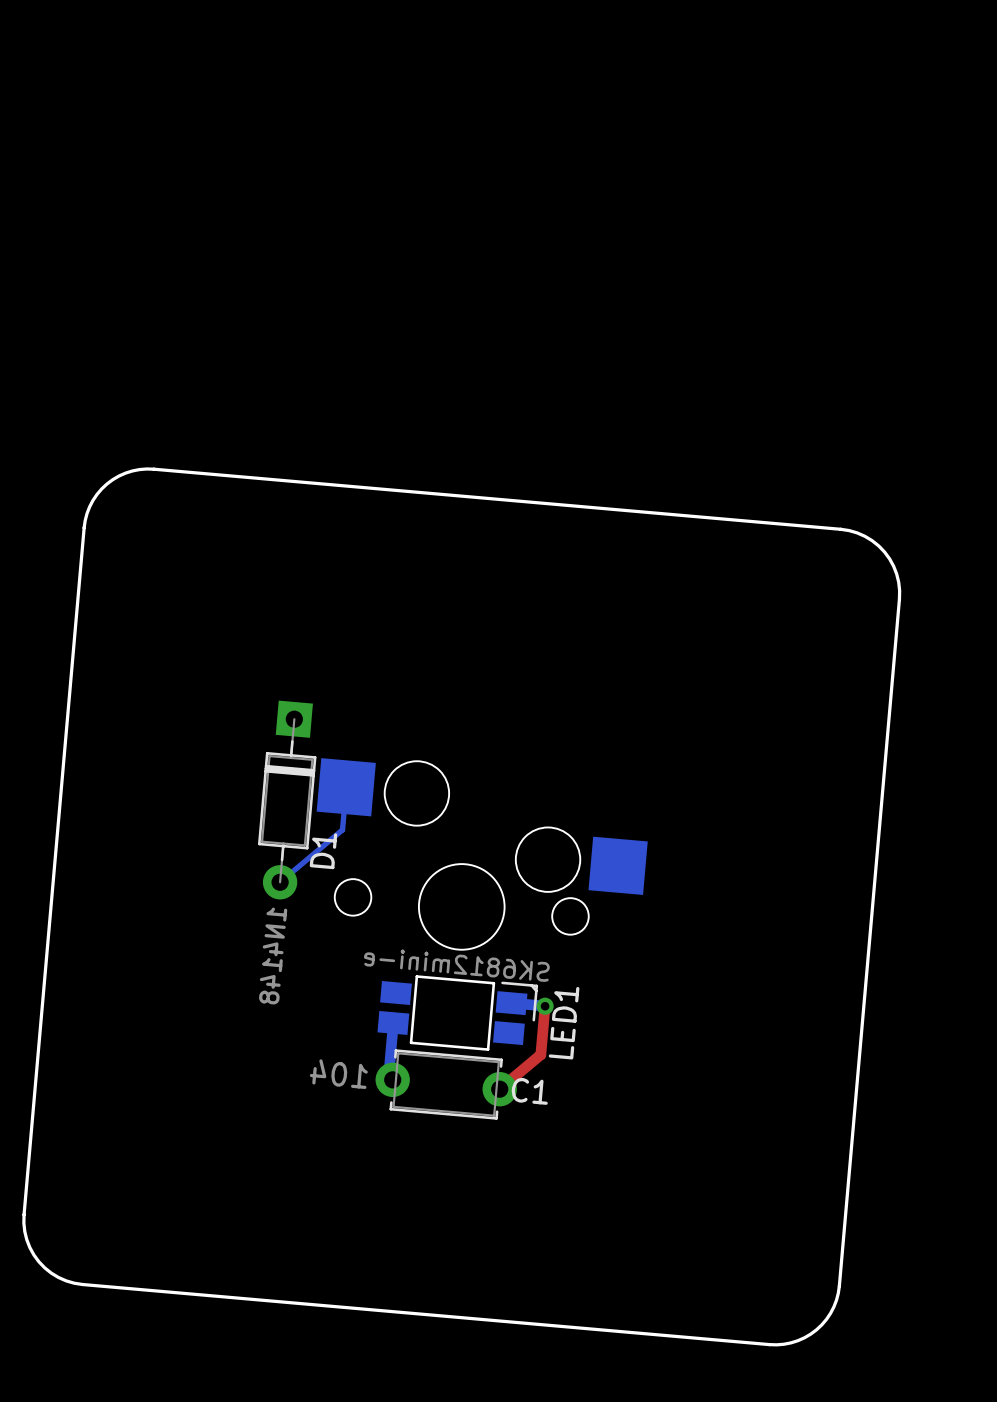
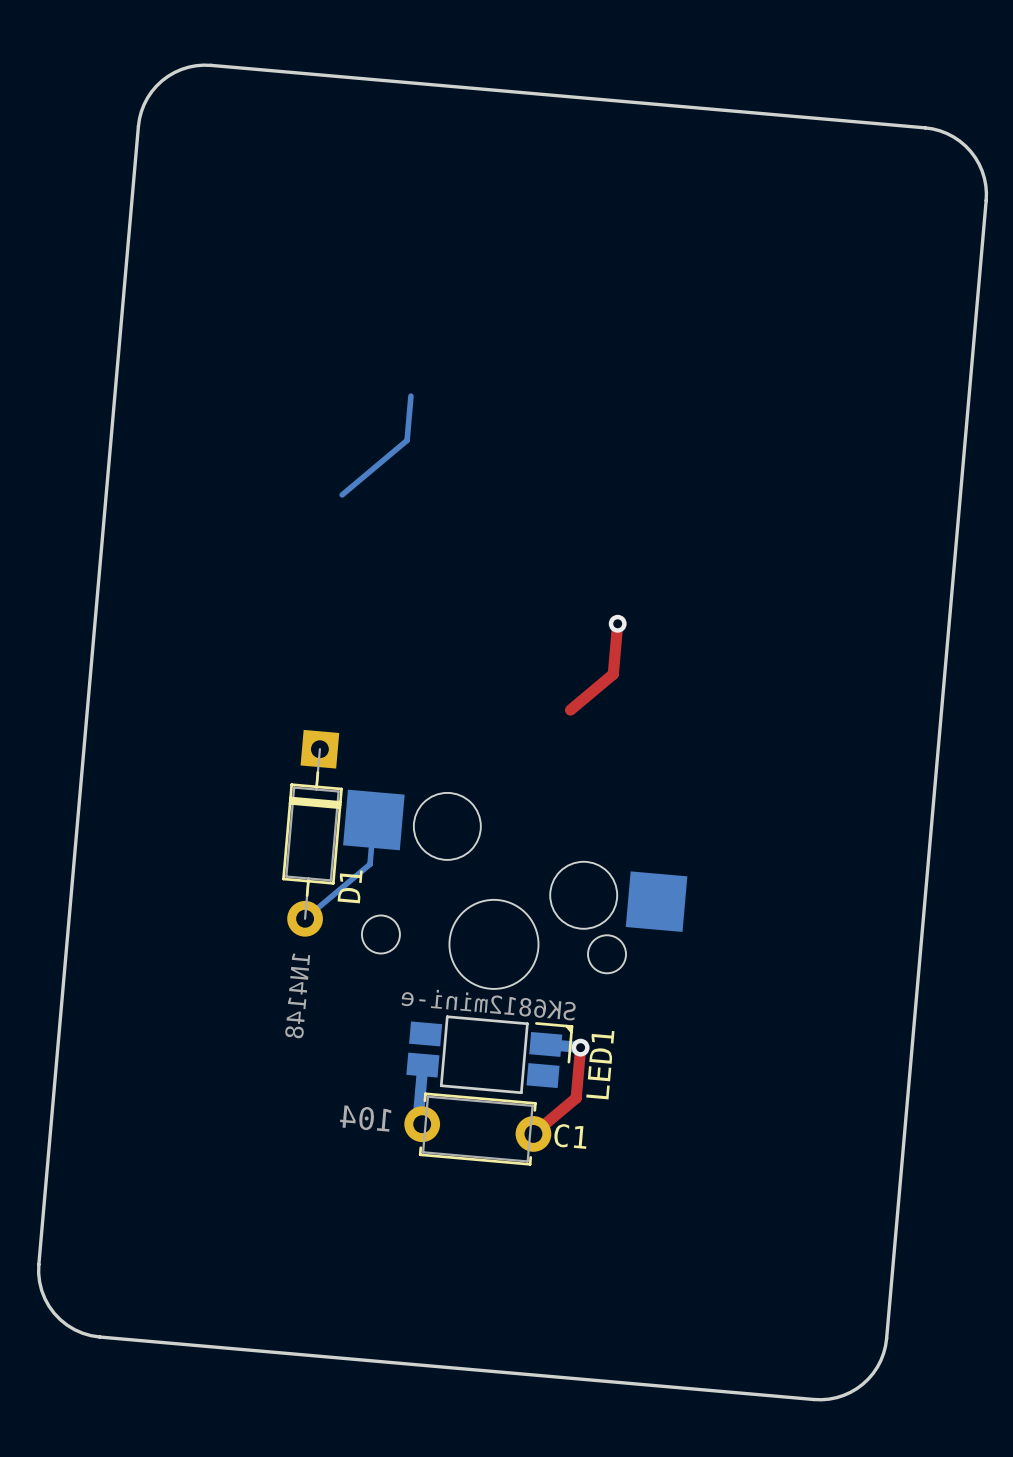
bottom track: none -> (410, 396) (407, 440) (342, 494)
board edge: (84, 527) (87, 513) (92, 500) (106, 484) (118, 476) (132, 470) (153, 469) (849, 530) (872, 540) (884, 552) (896, 574) (899, 599) -> (101, 550) (139, 118) (147, 97) (156, 85) (168, 76) (188, 67) (211, 65) (925, 127) (947, 133) (959, 141) (970, 151) (979, 164) (984, 178) (986, 192) (949, 624)
top track: none -> (617, 623) (613, 674) (570, 710)
via: none -> (617, 623)

